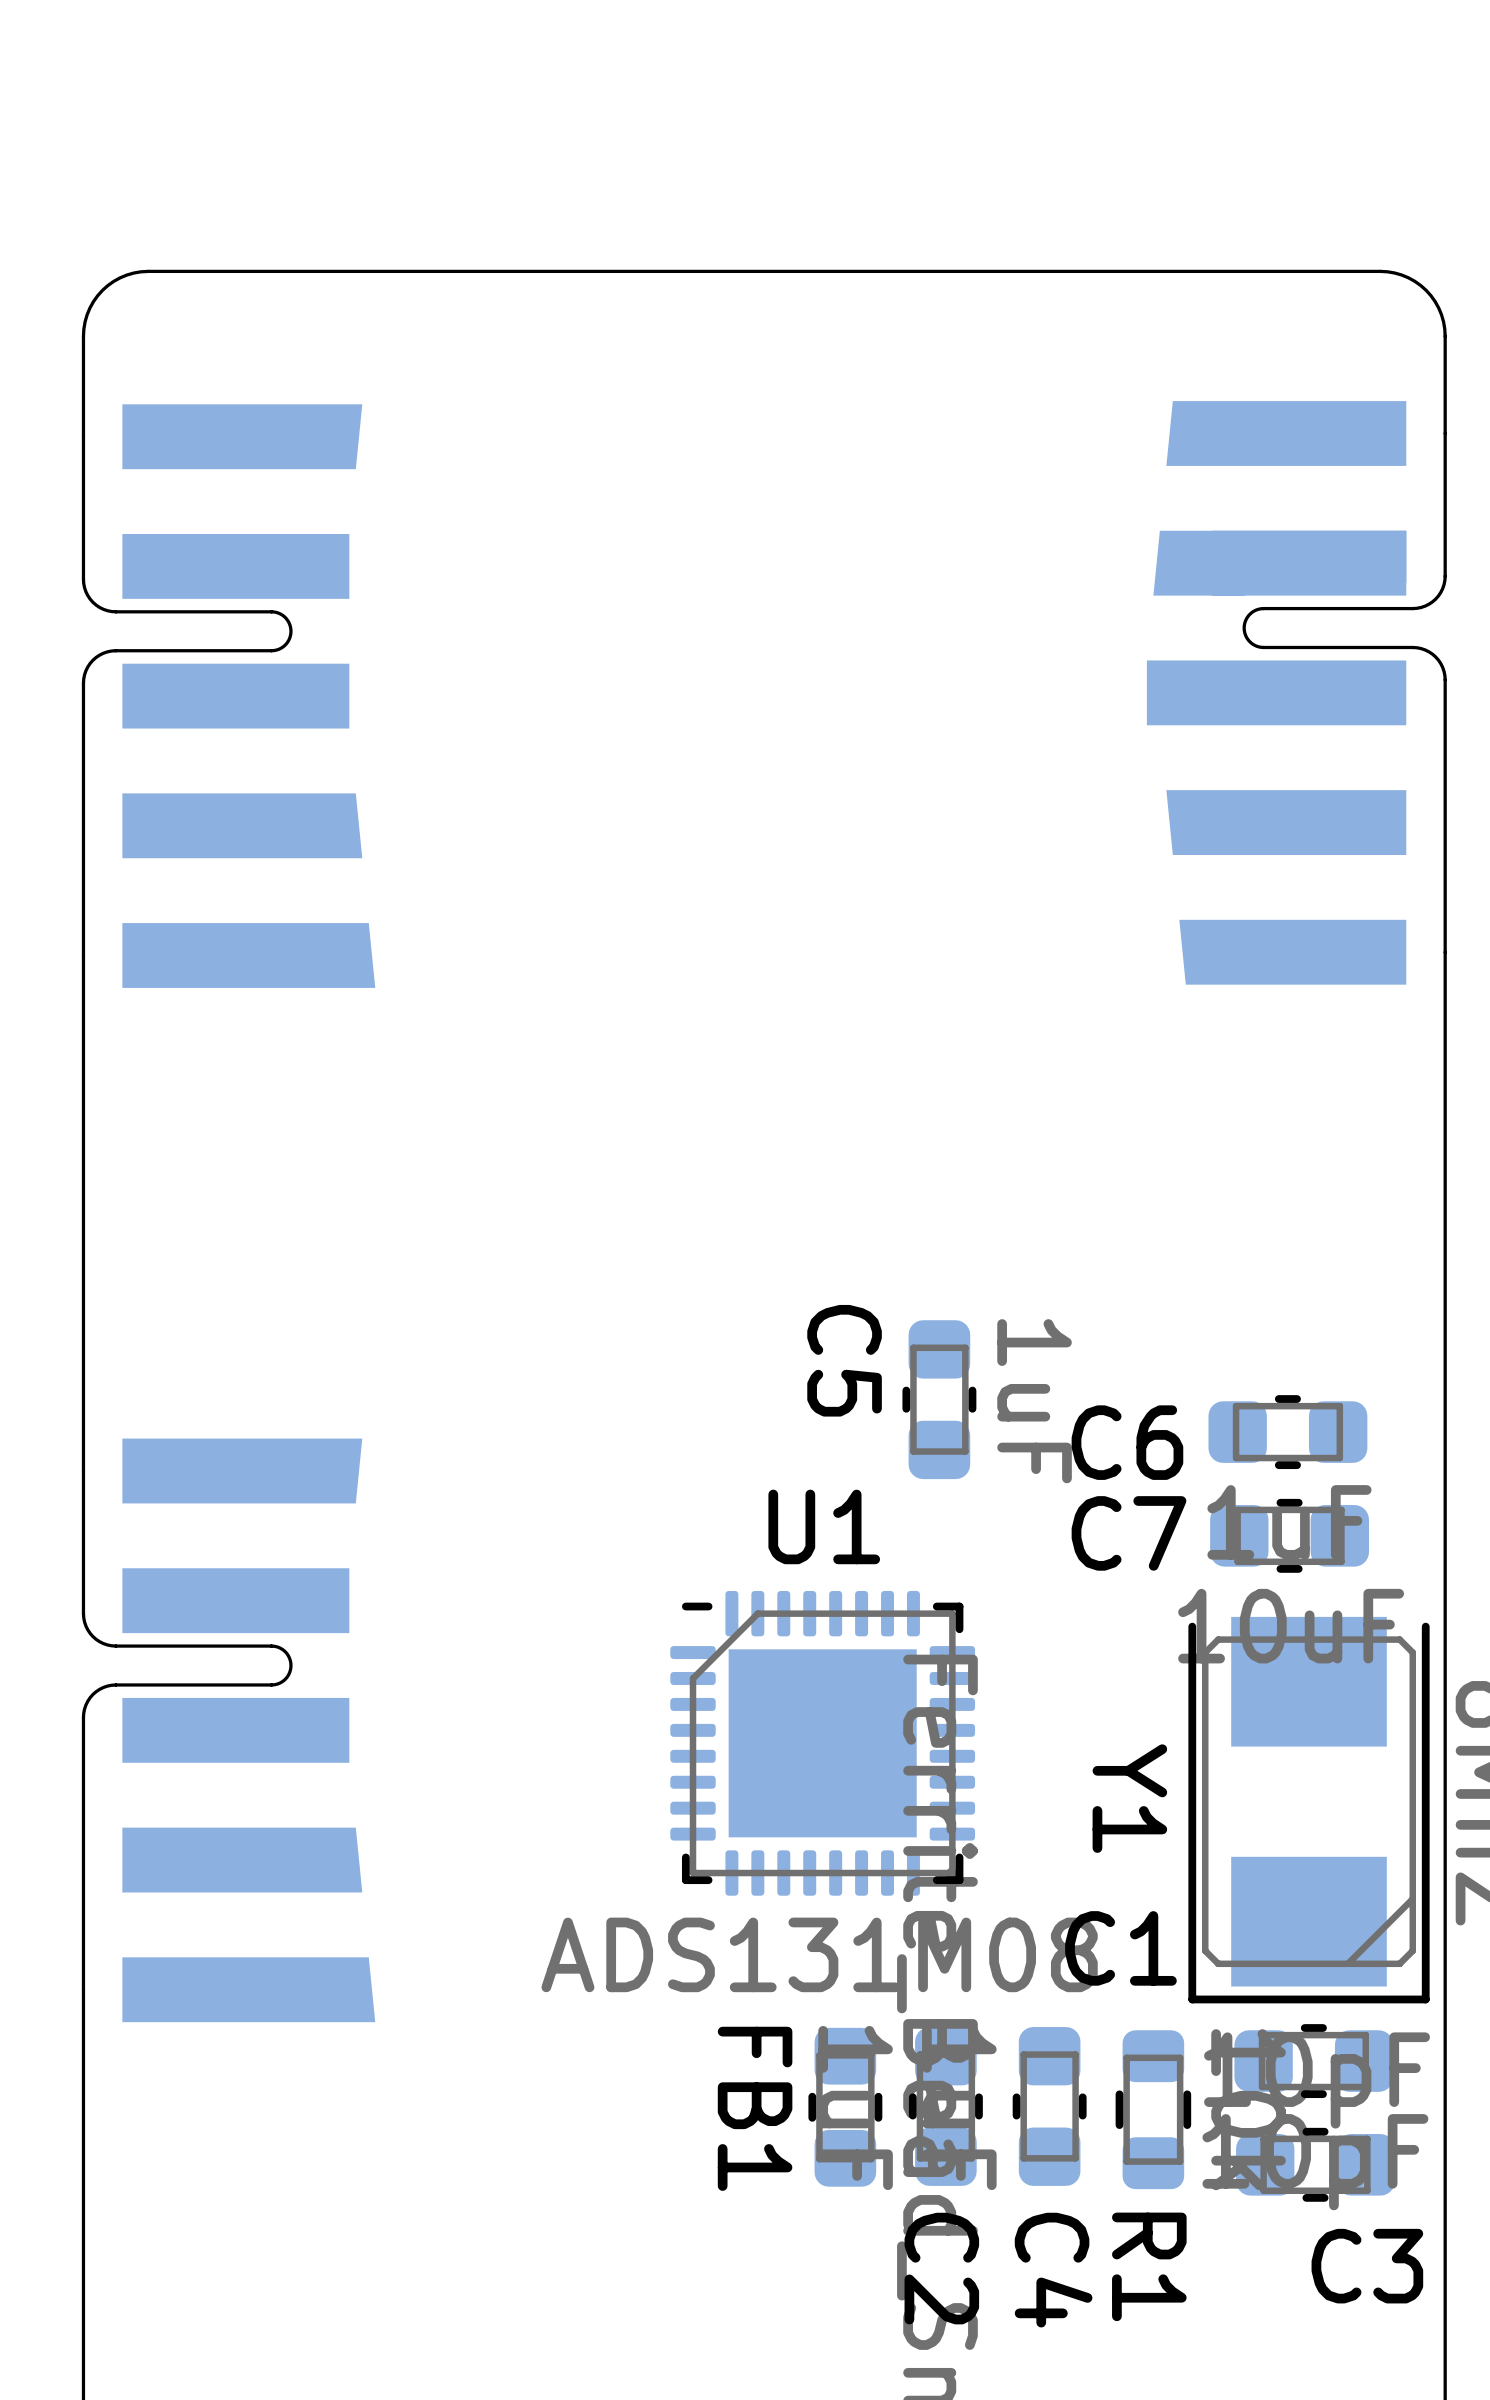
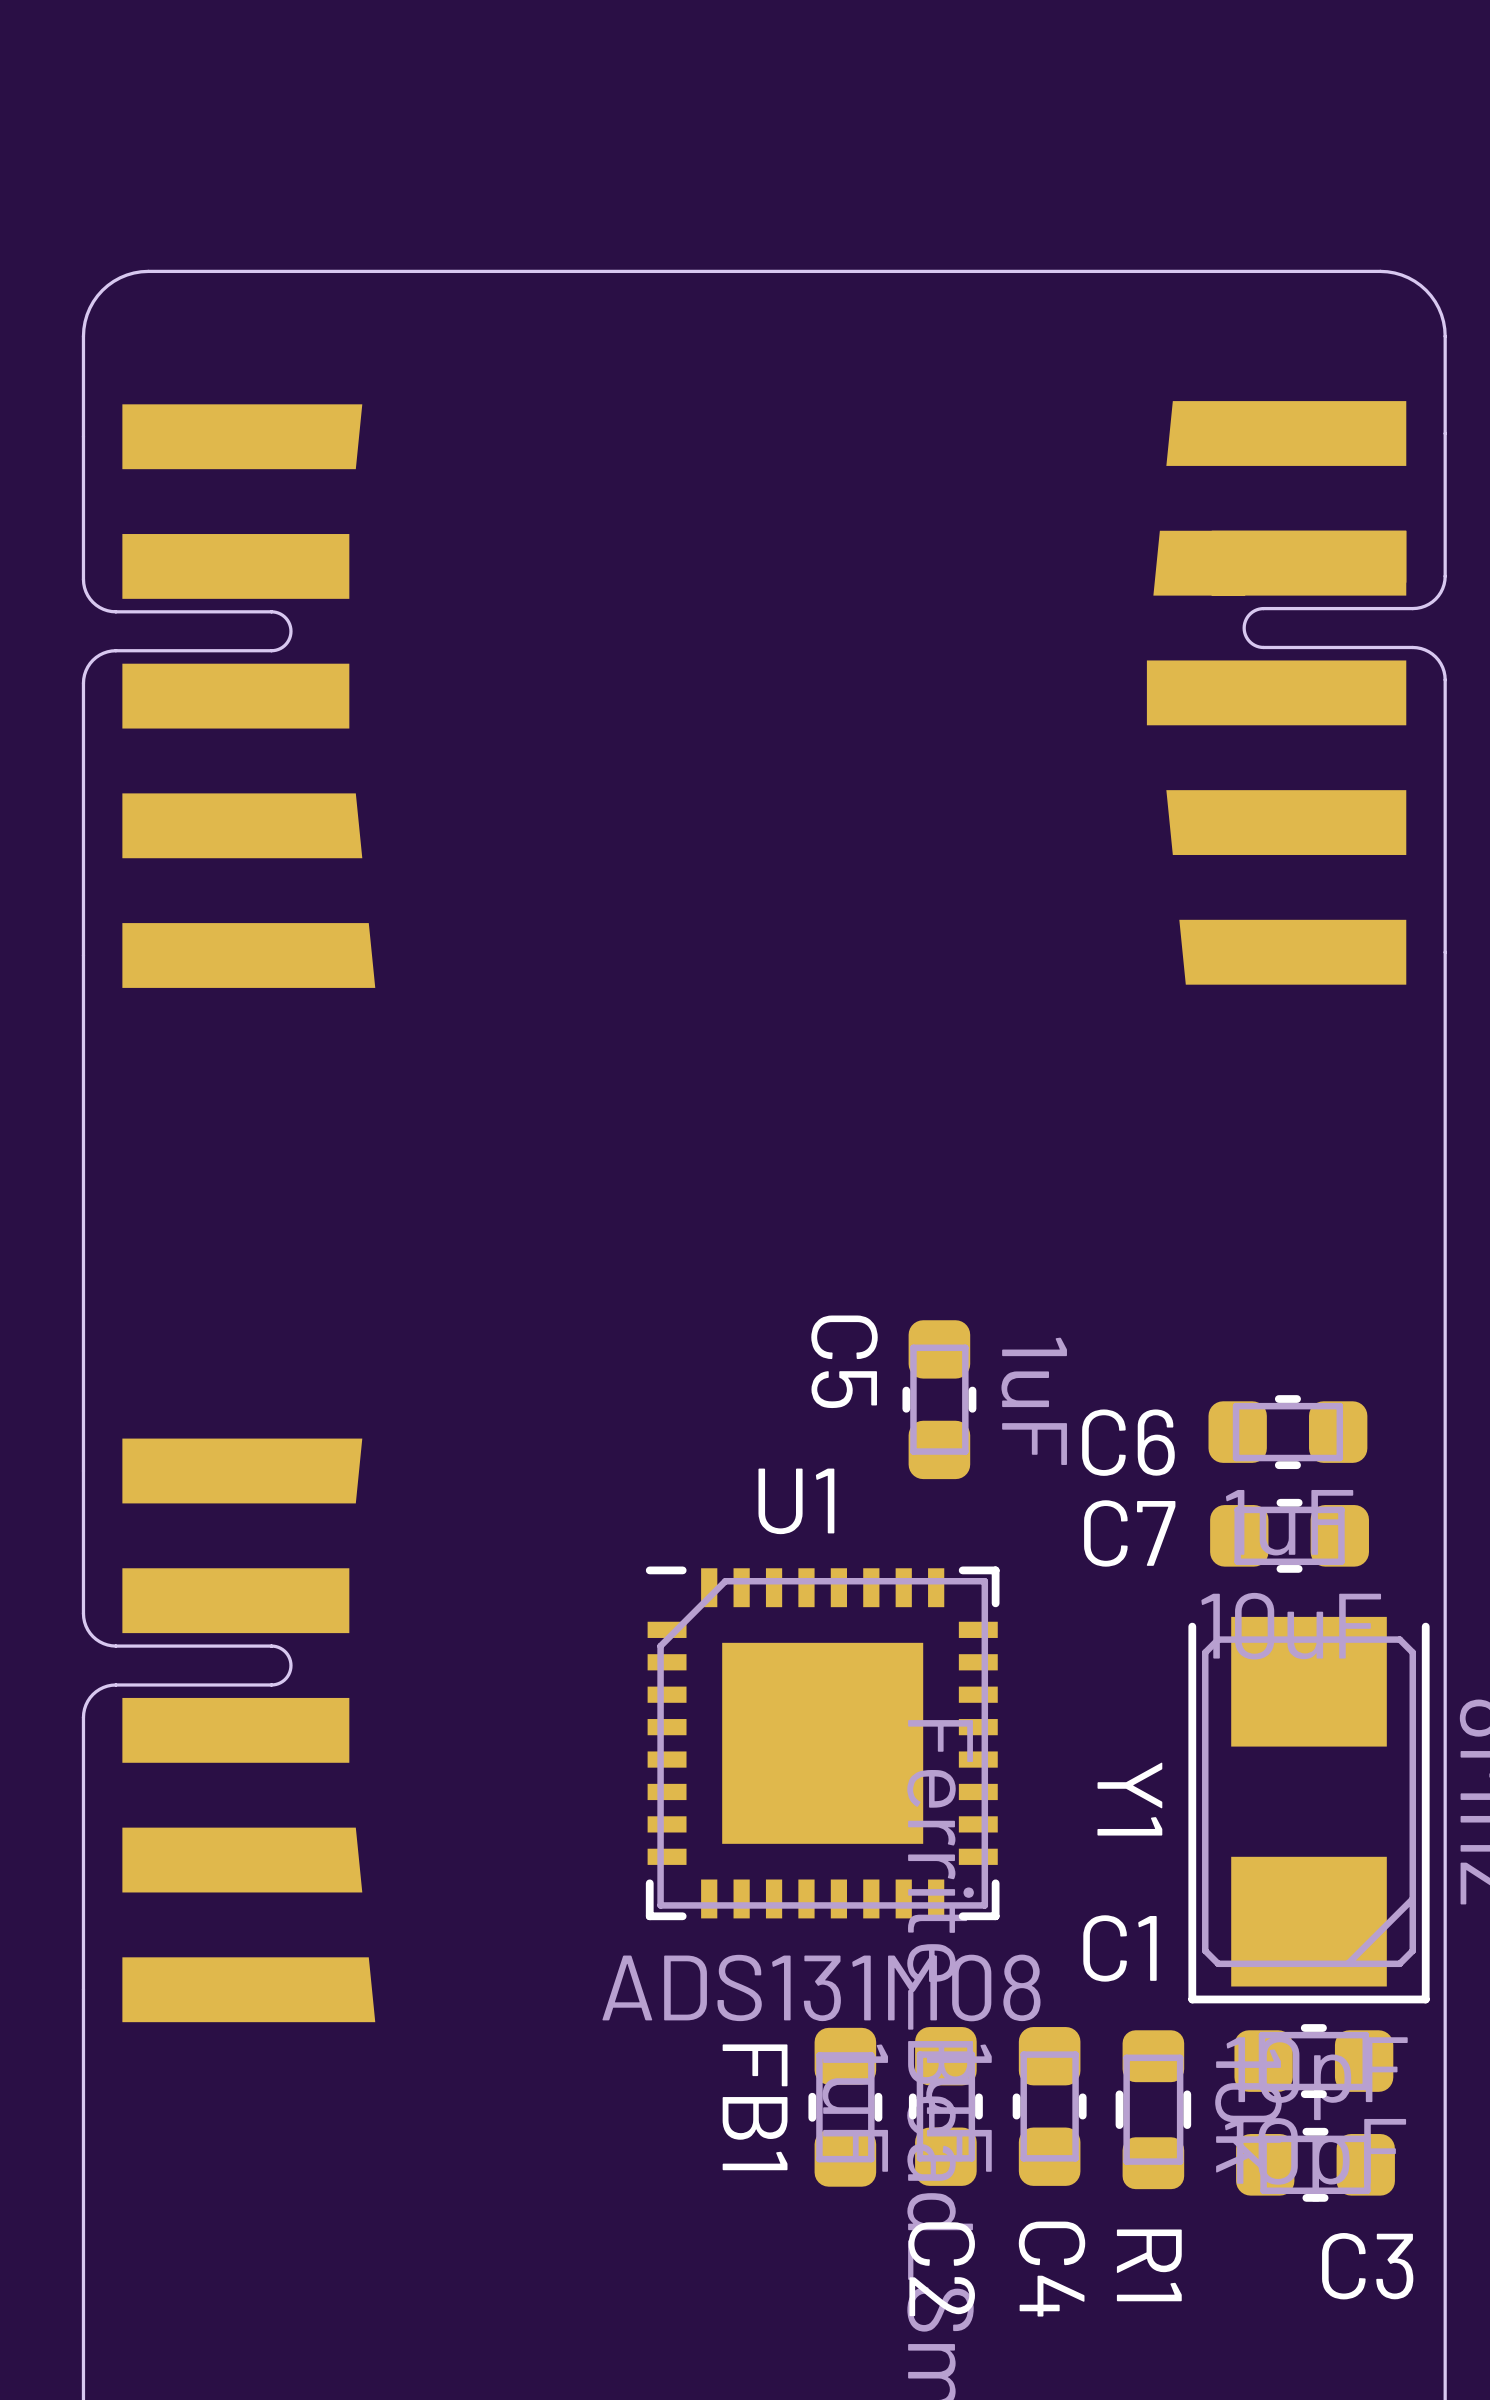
U1 name position: U1 (824, 1526) -> U1 (796, 1501)
U1 footprint: [670, 1590, 976, 1896] -> [645, 1566, 1000, 1921]
U1 value position: ADS131M08 (819, 1954) -> ADS131M08 (821, 1987)

